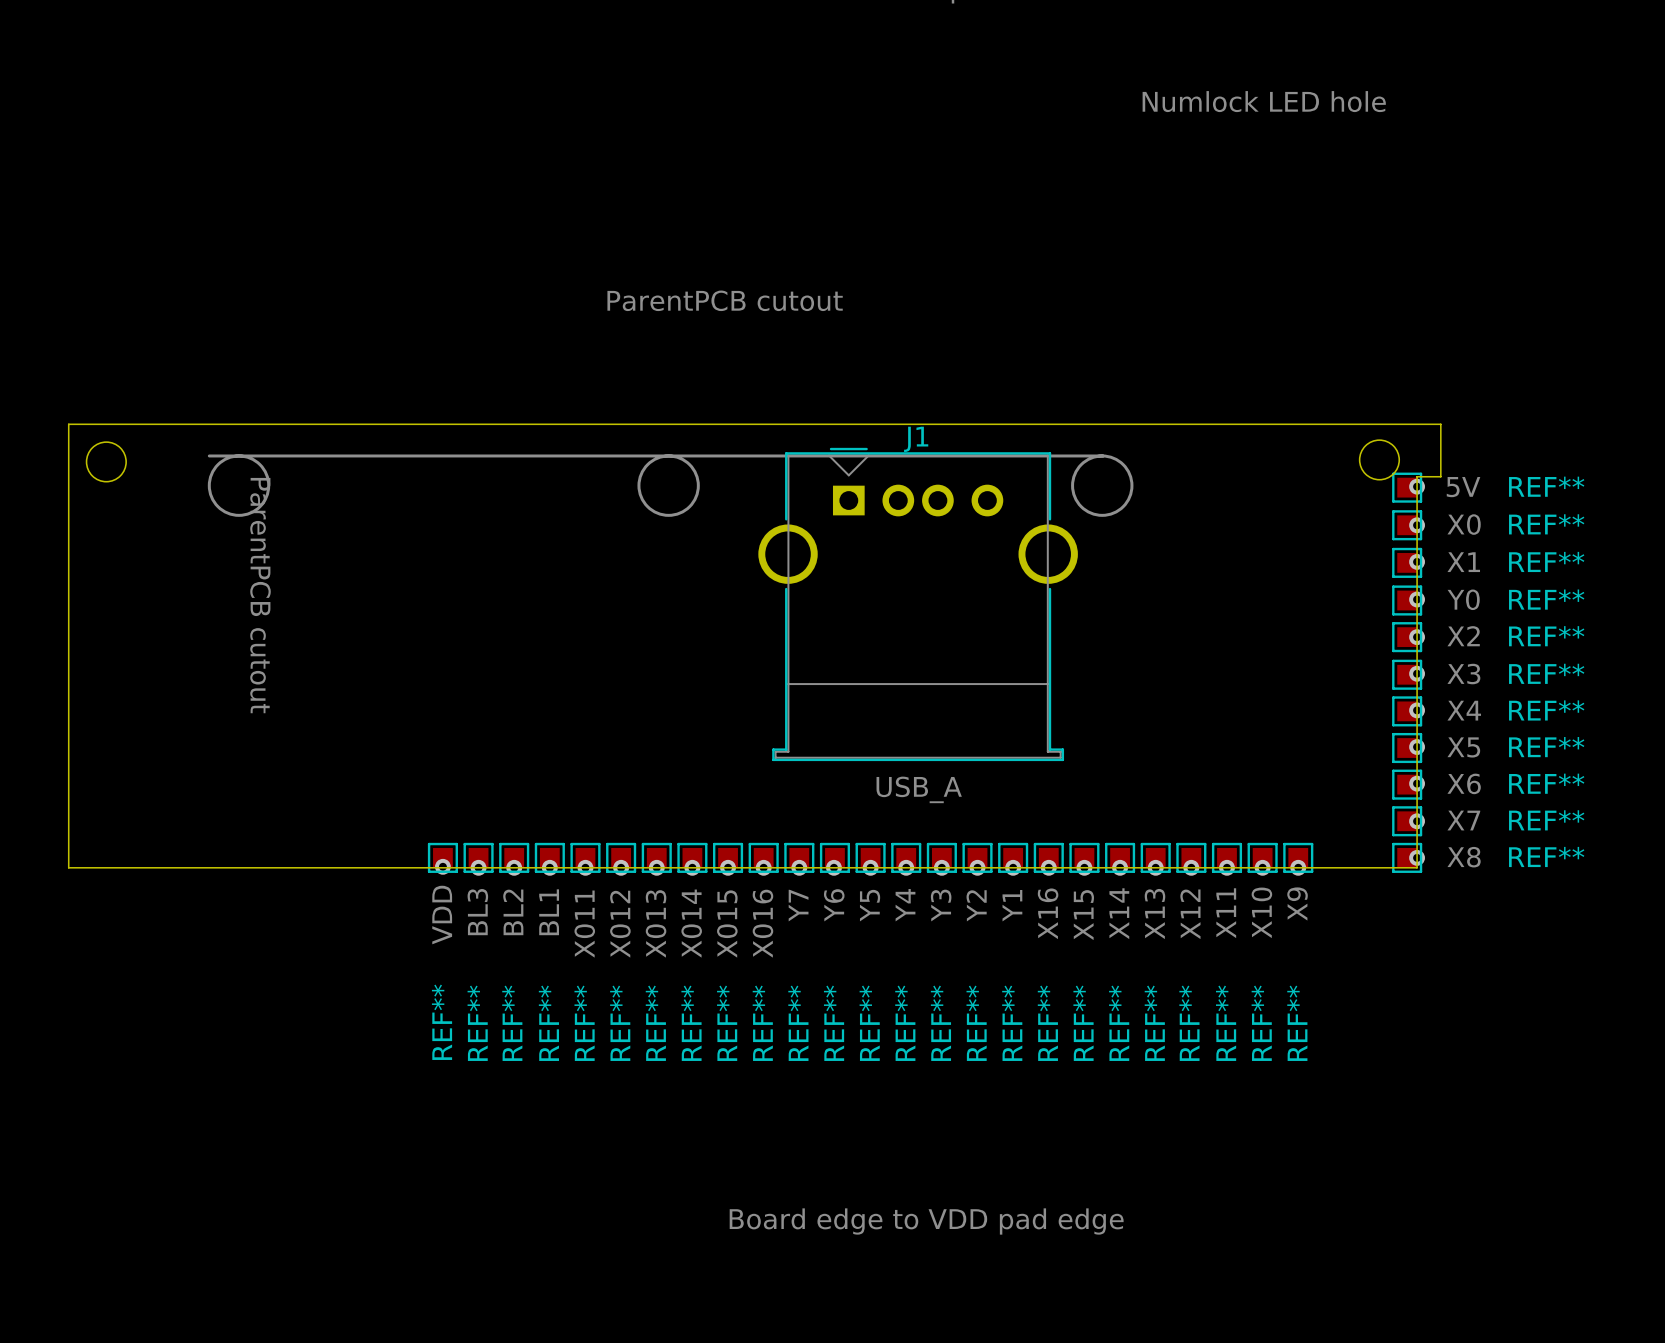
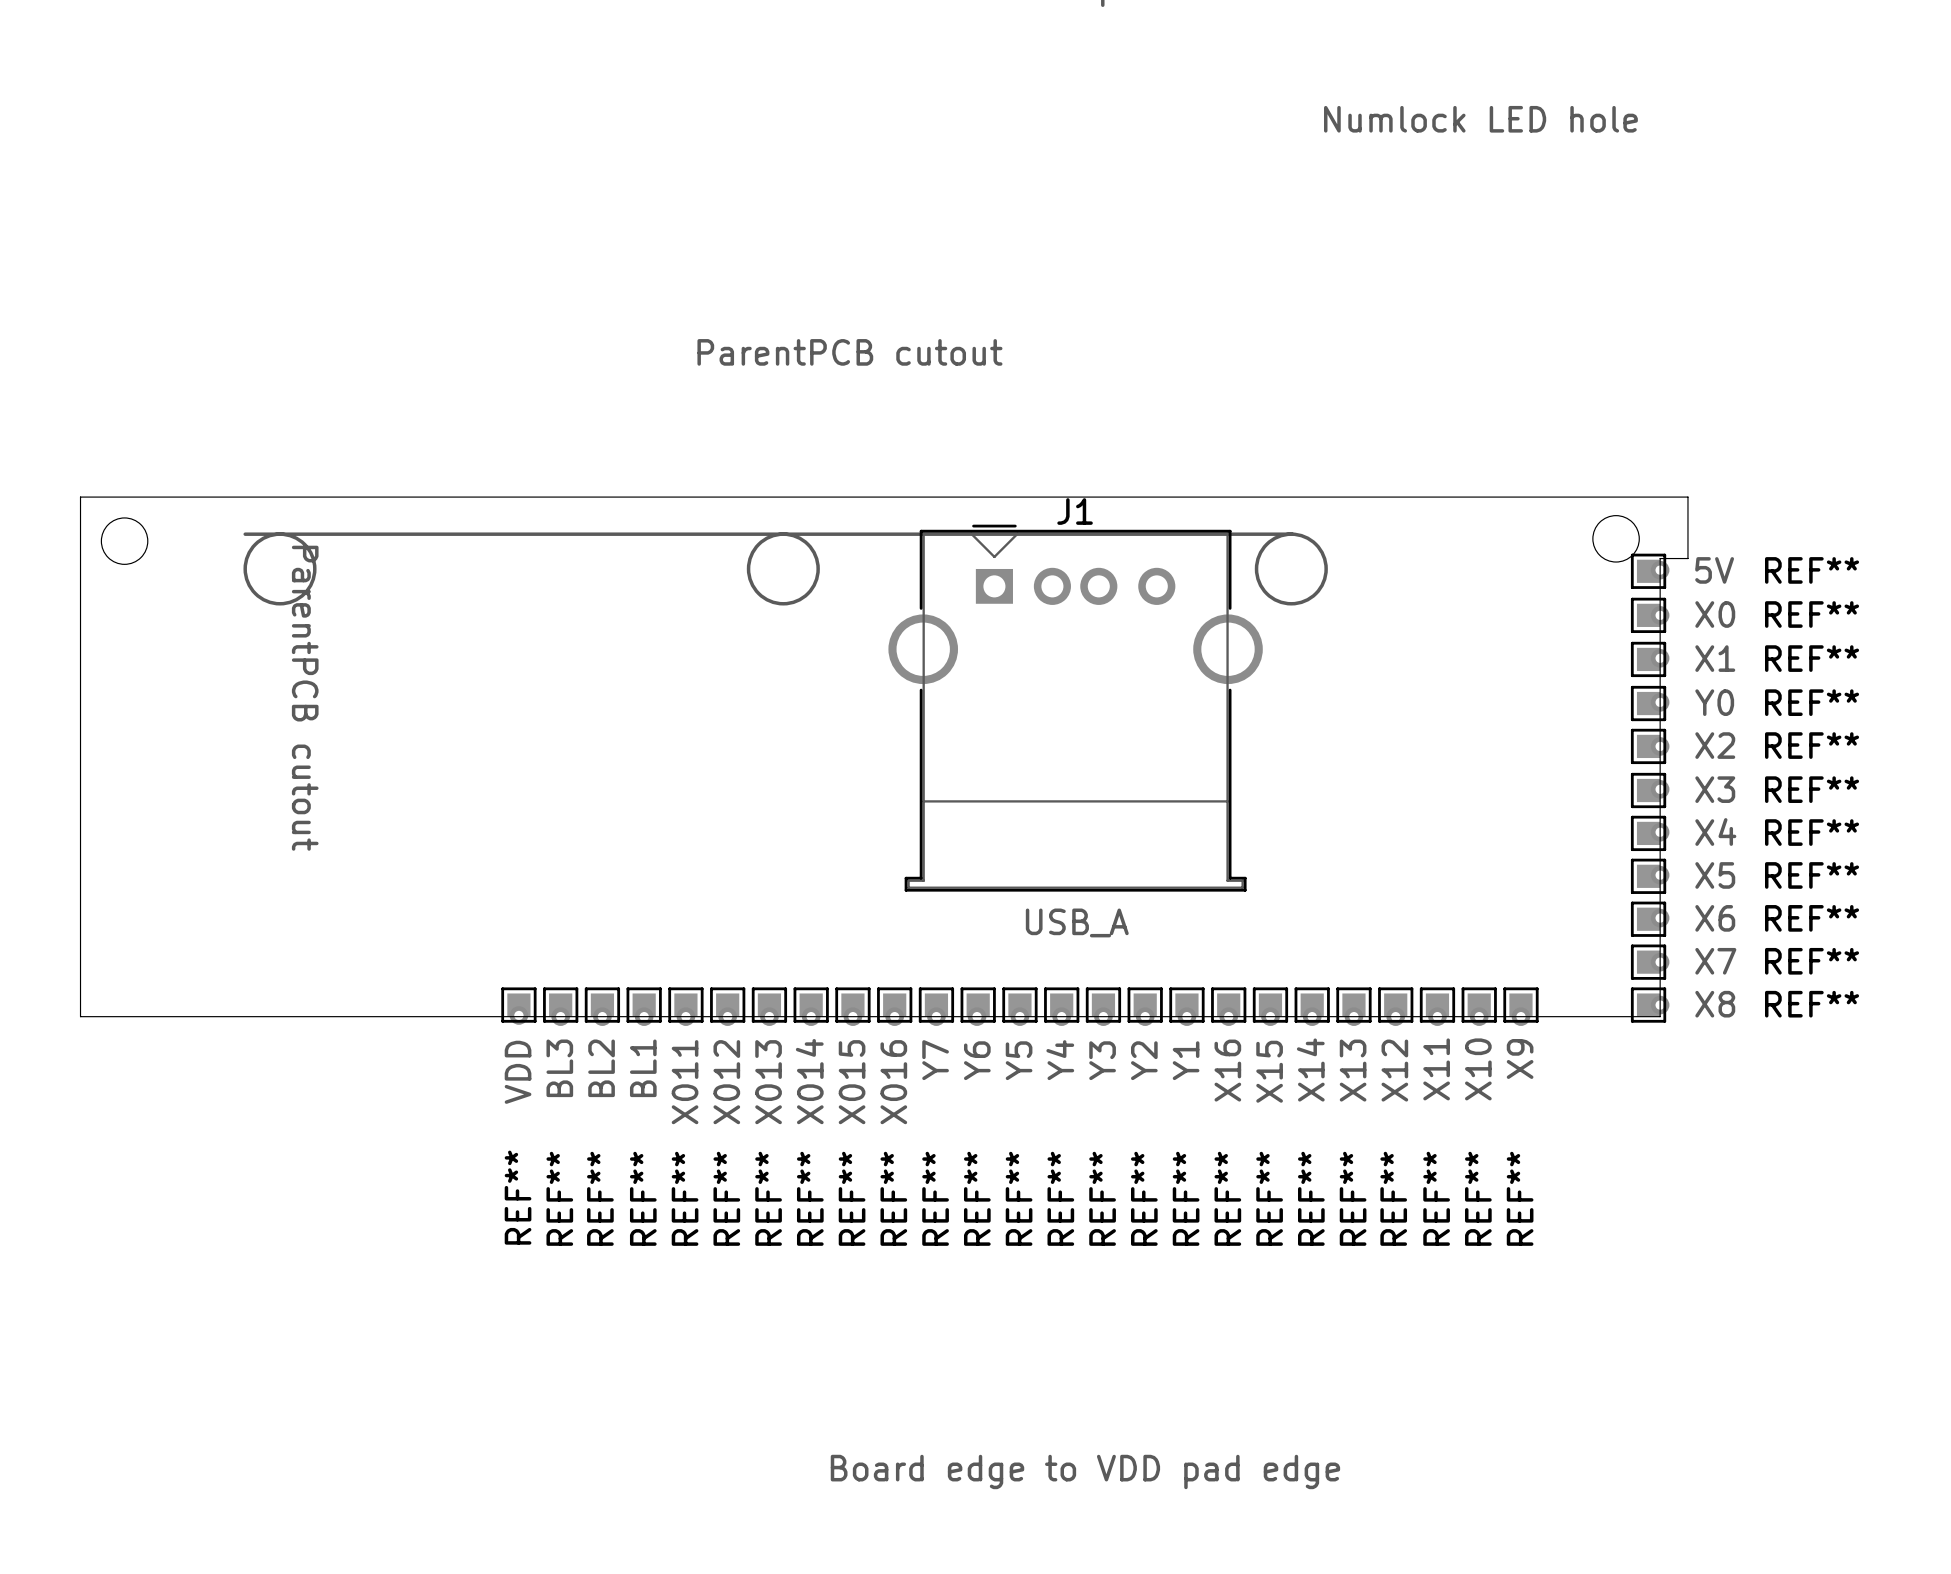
text position: Board edge to VDD pad edge (926, 1221) -> Board edge to VDD pad edge (1085, 1471)

